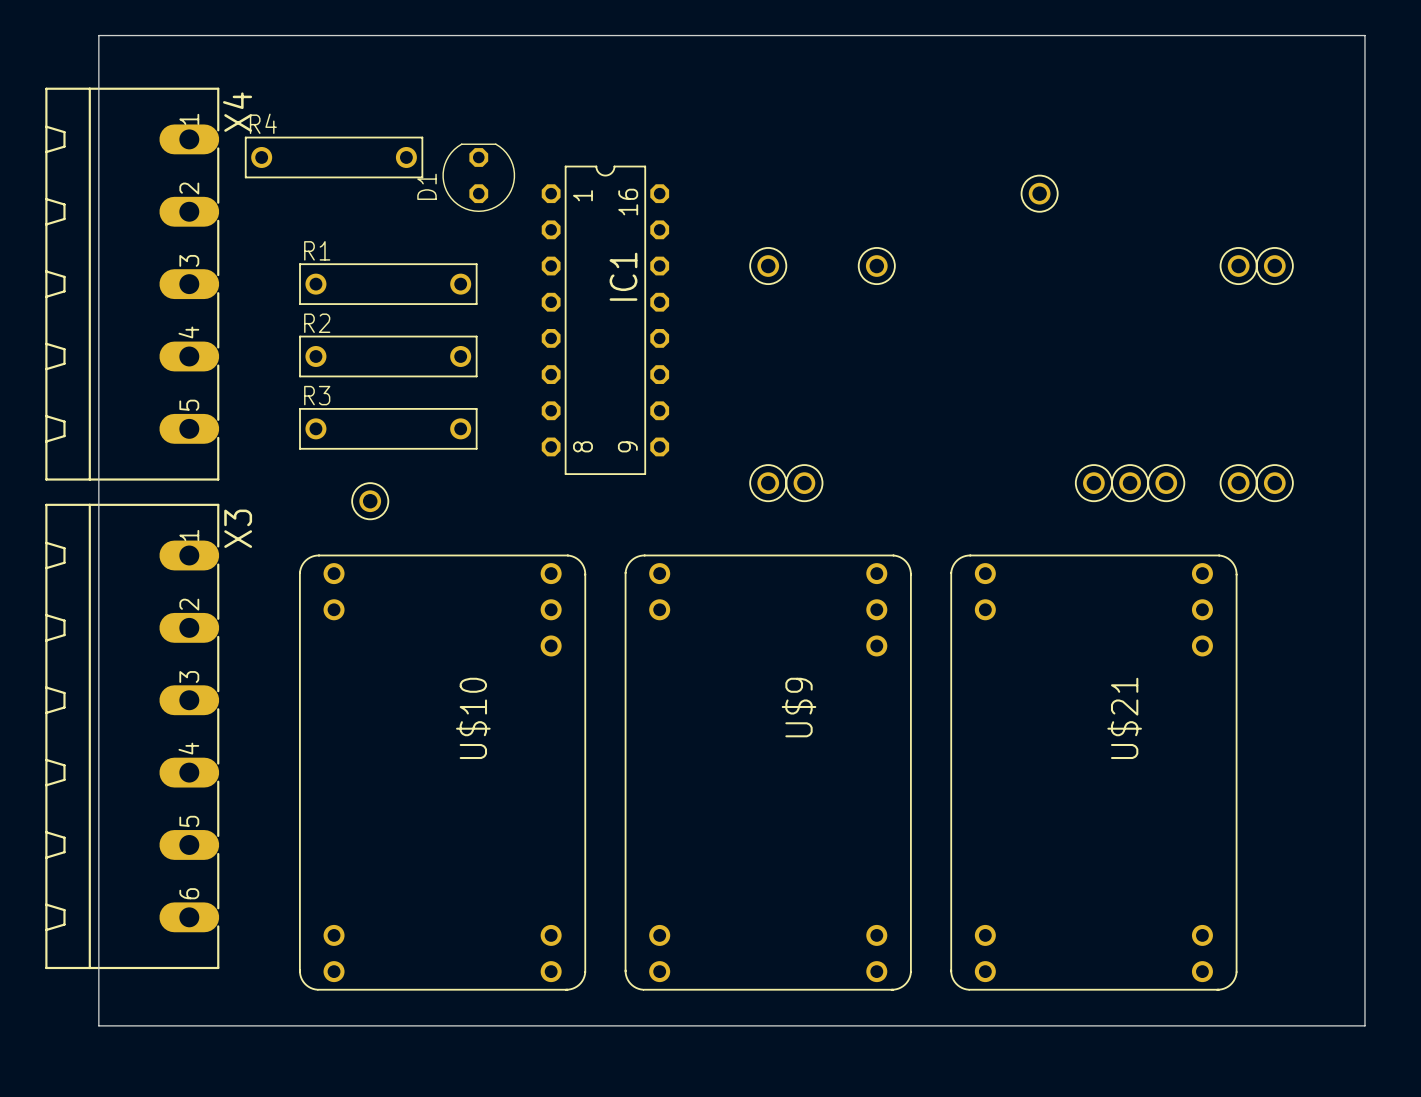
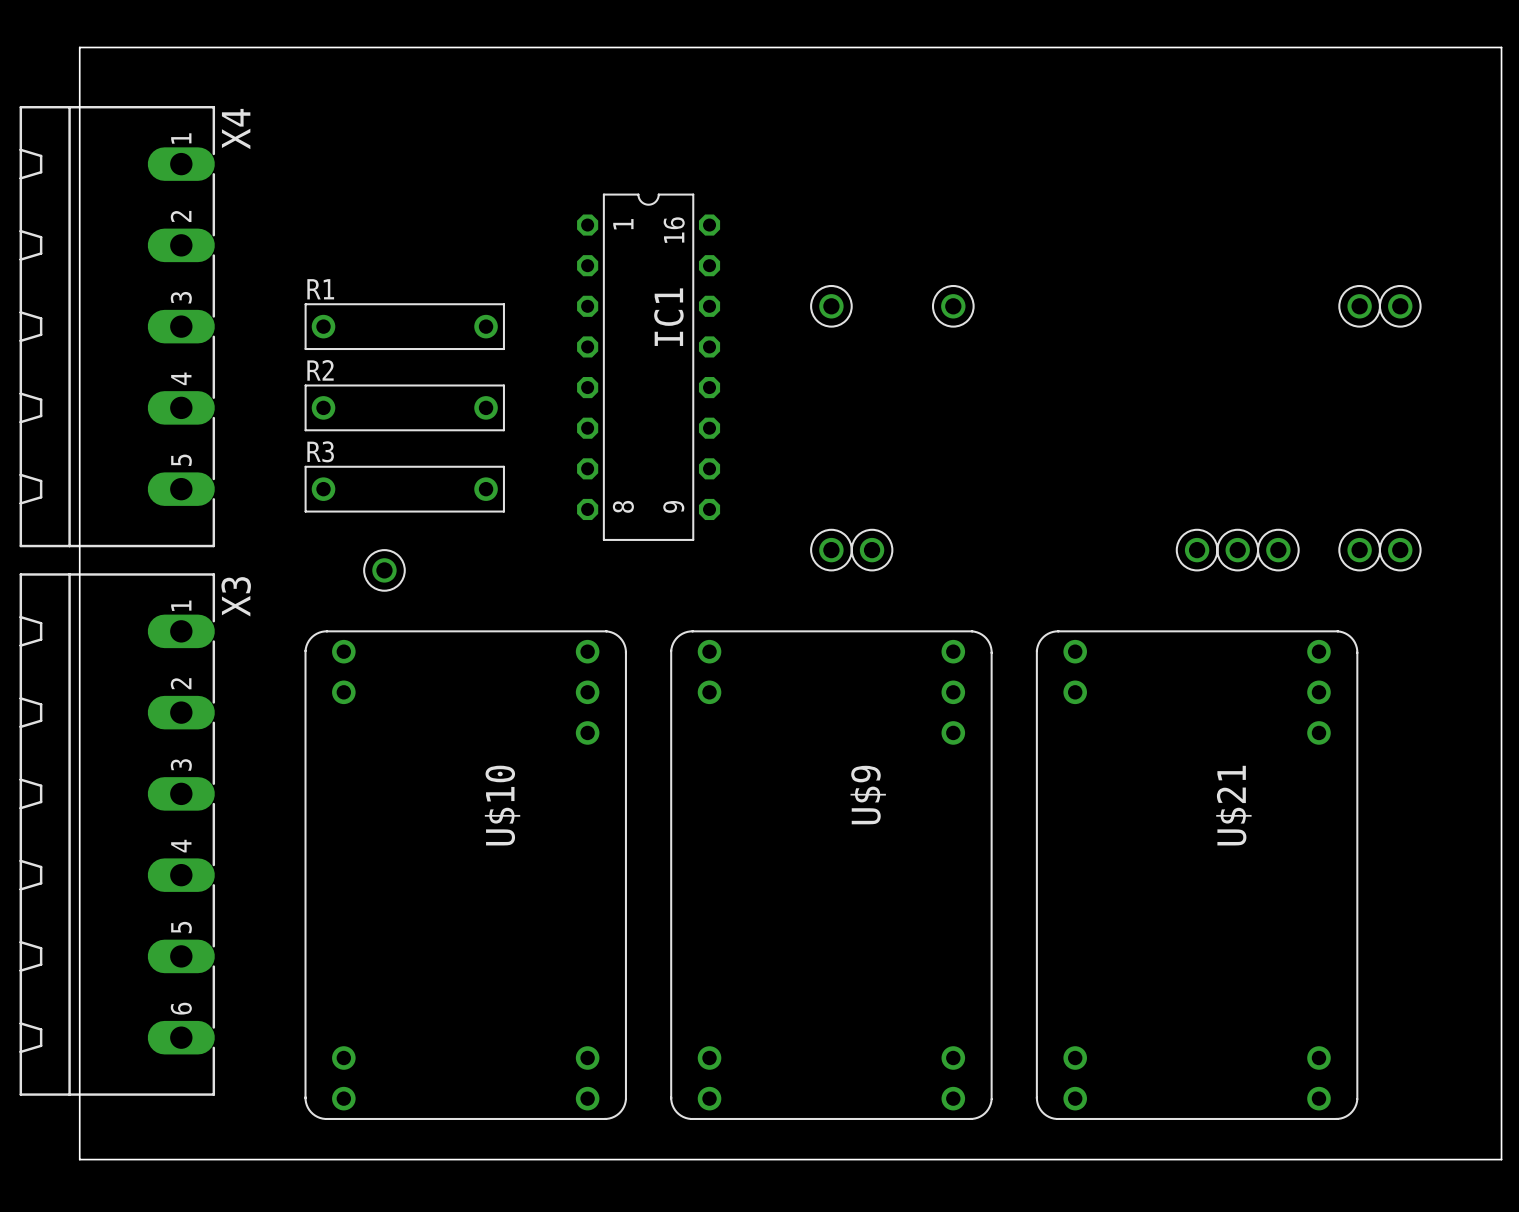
R4: (334, 157) -> none
D1: (478, 177) -> none
part: (1039, 193) -> none

